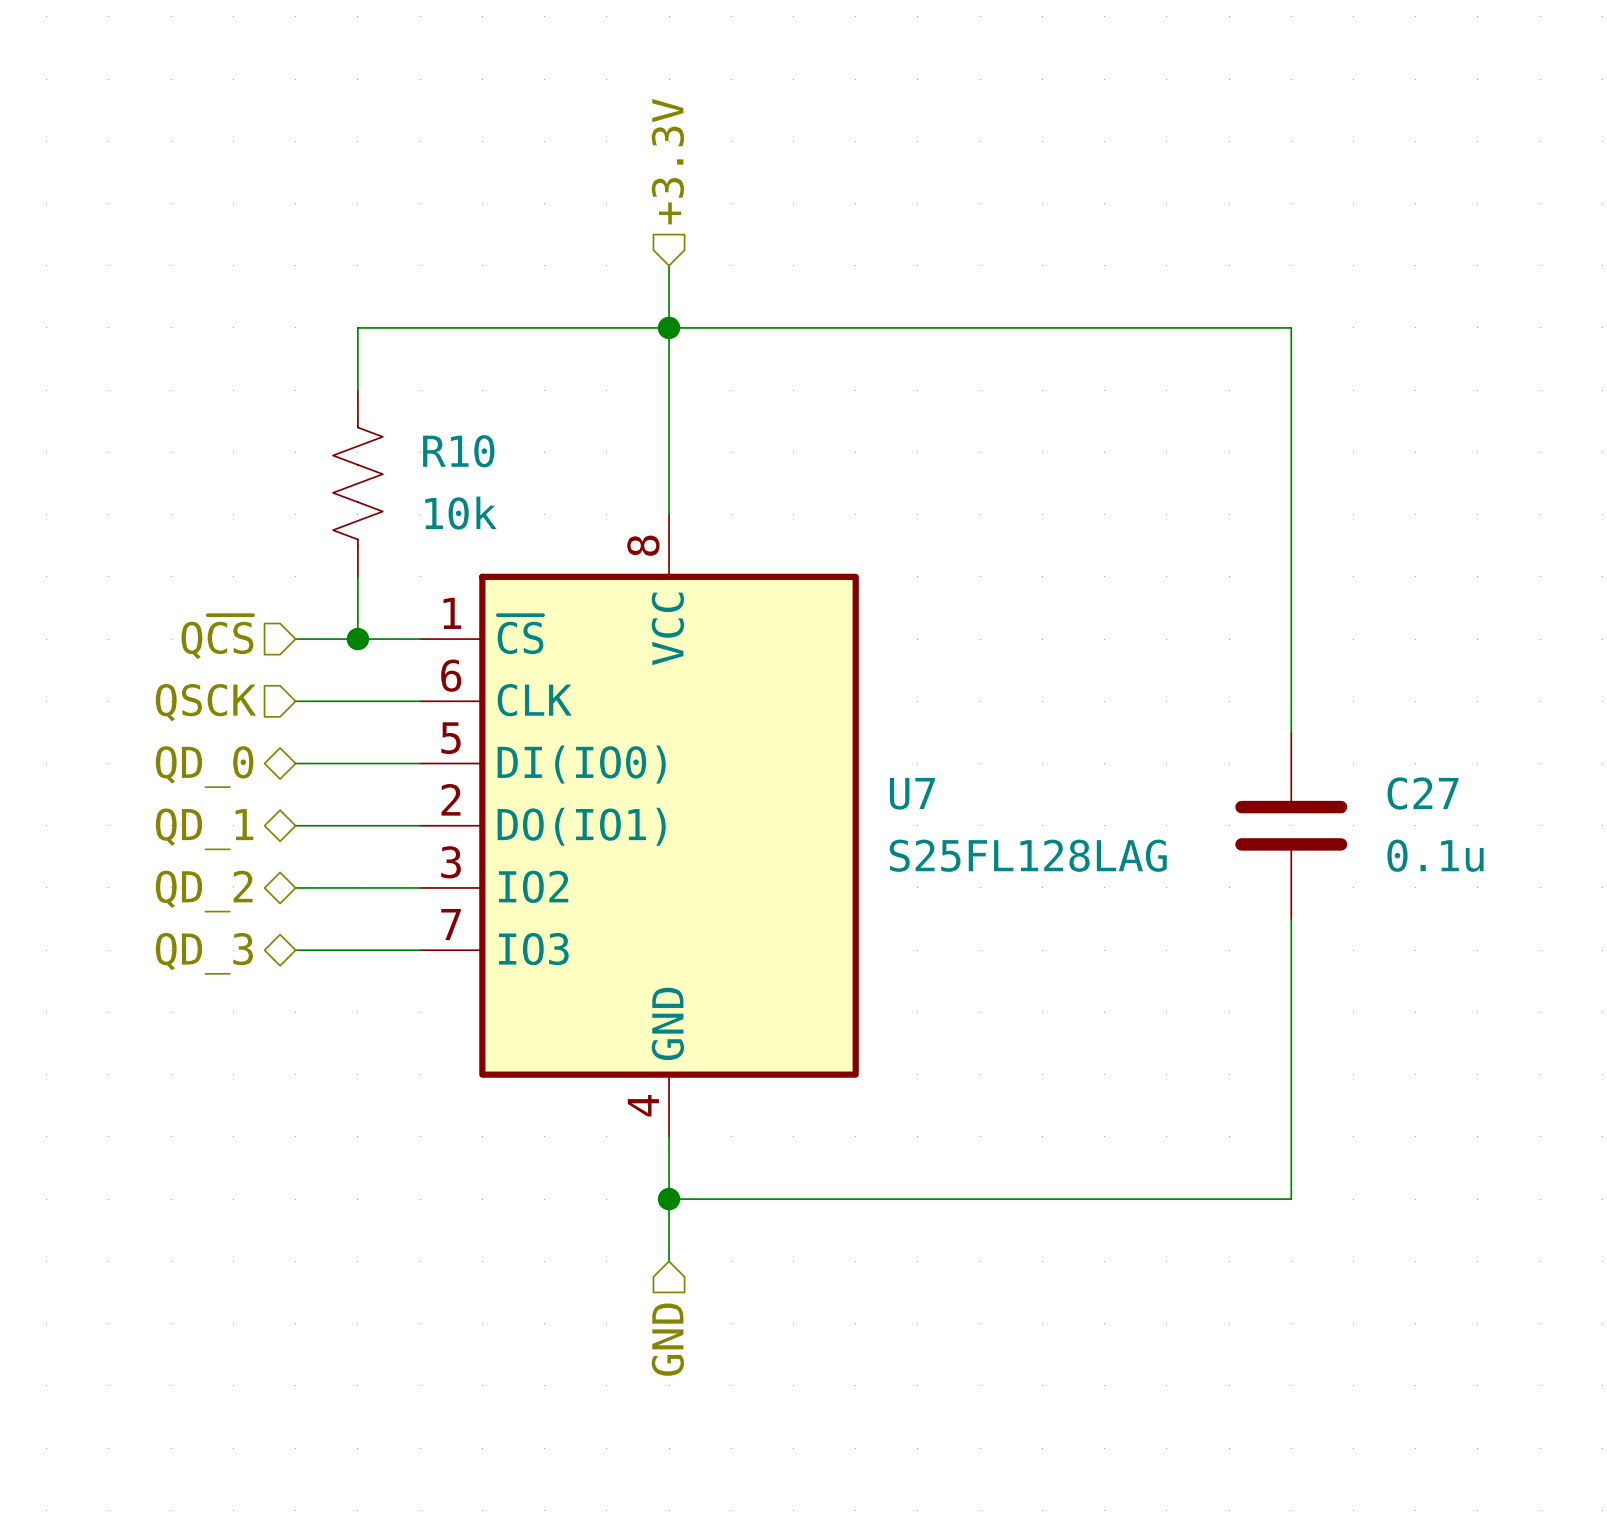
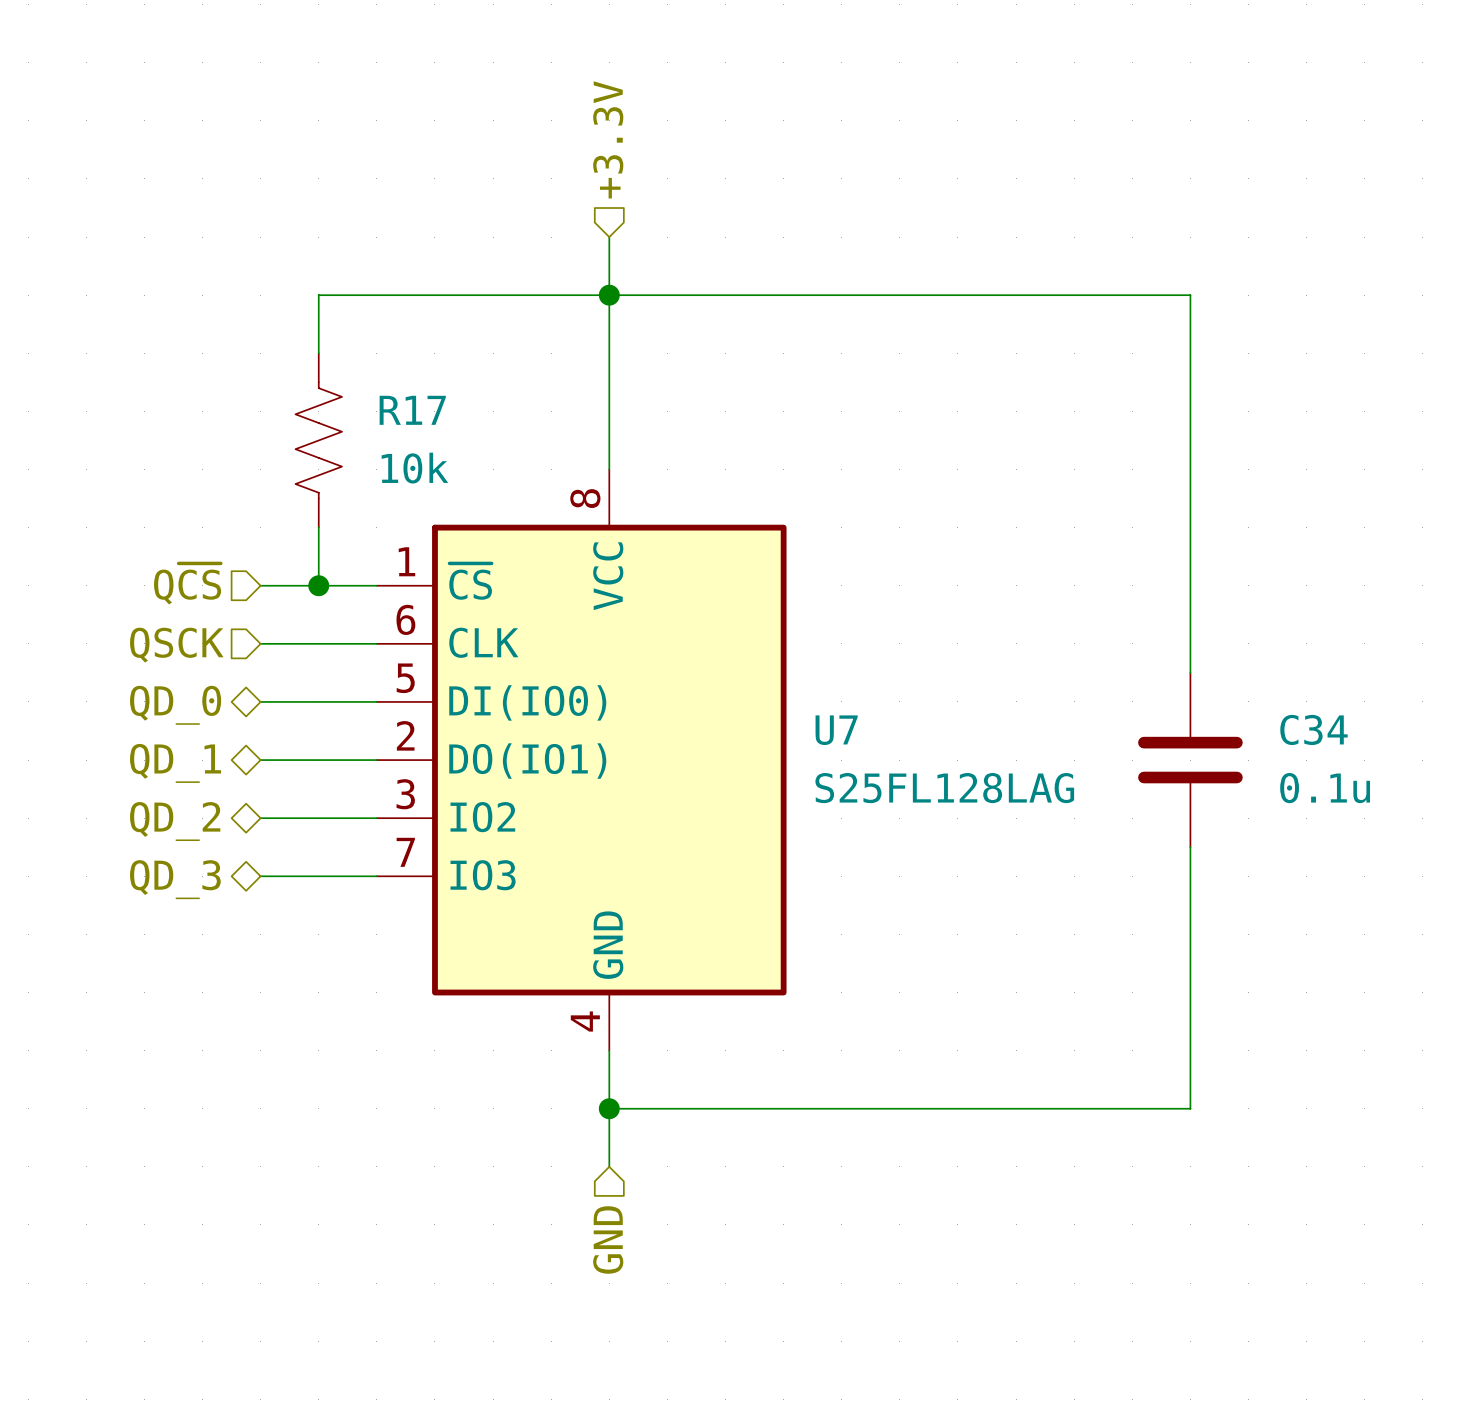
R10 name: R10 (458, 451) -> R17 (412, 410)
C27 name: C27 (1423, 793) -> C34 (1313, 729)

